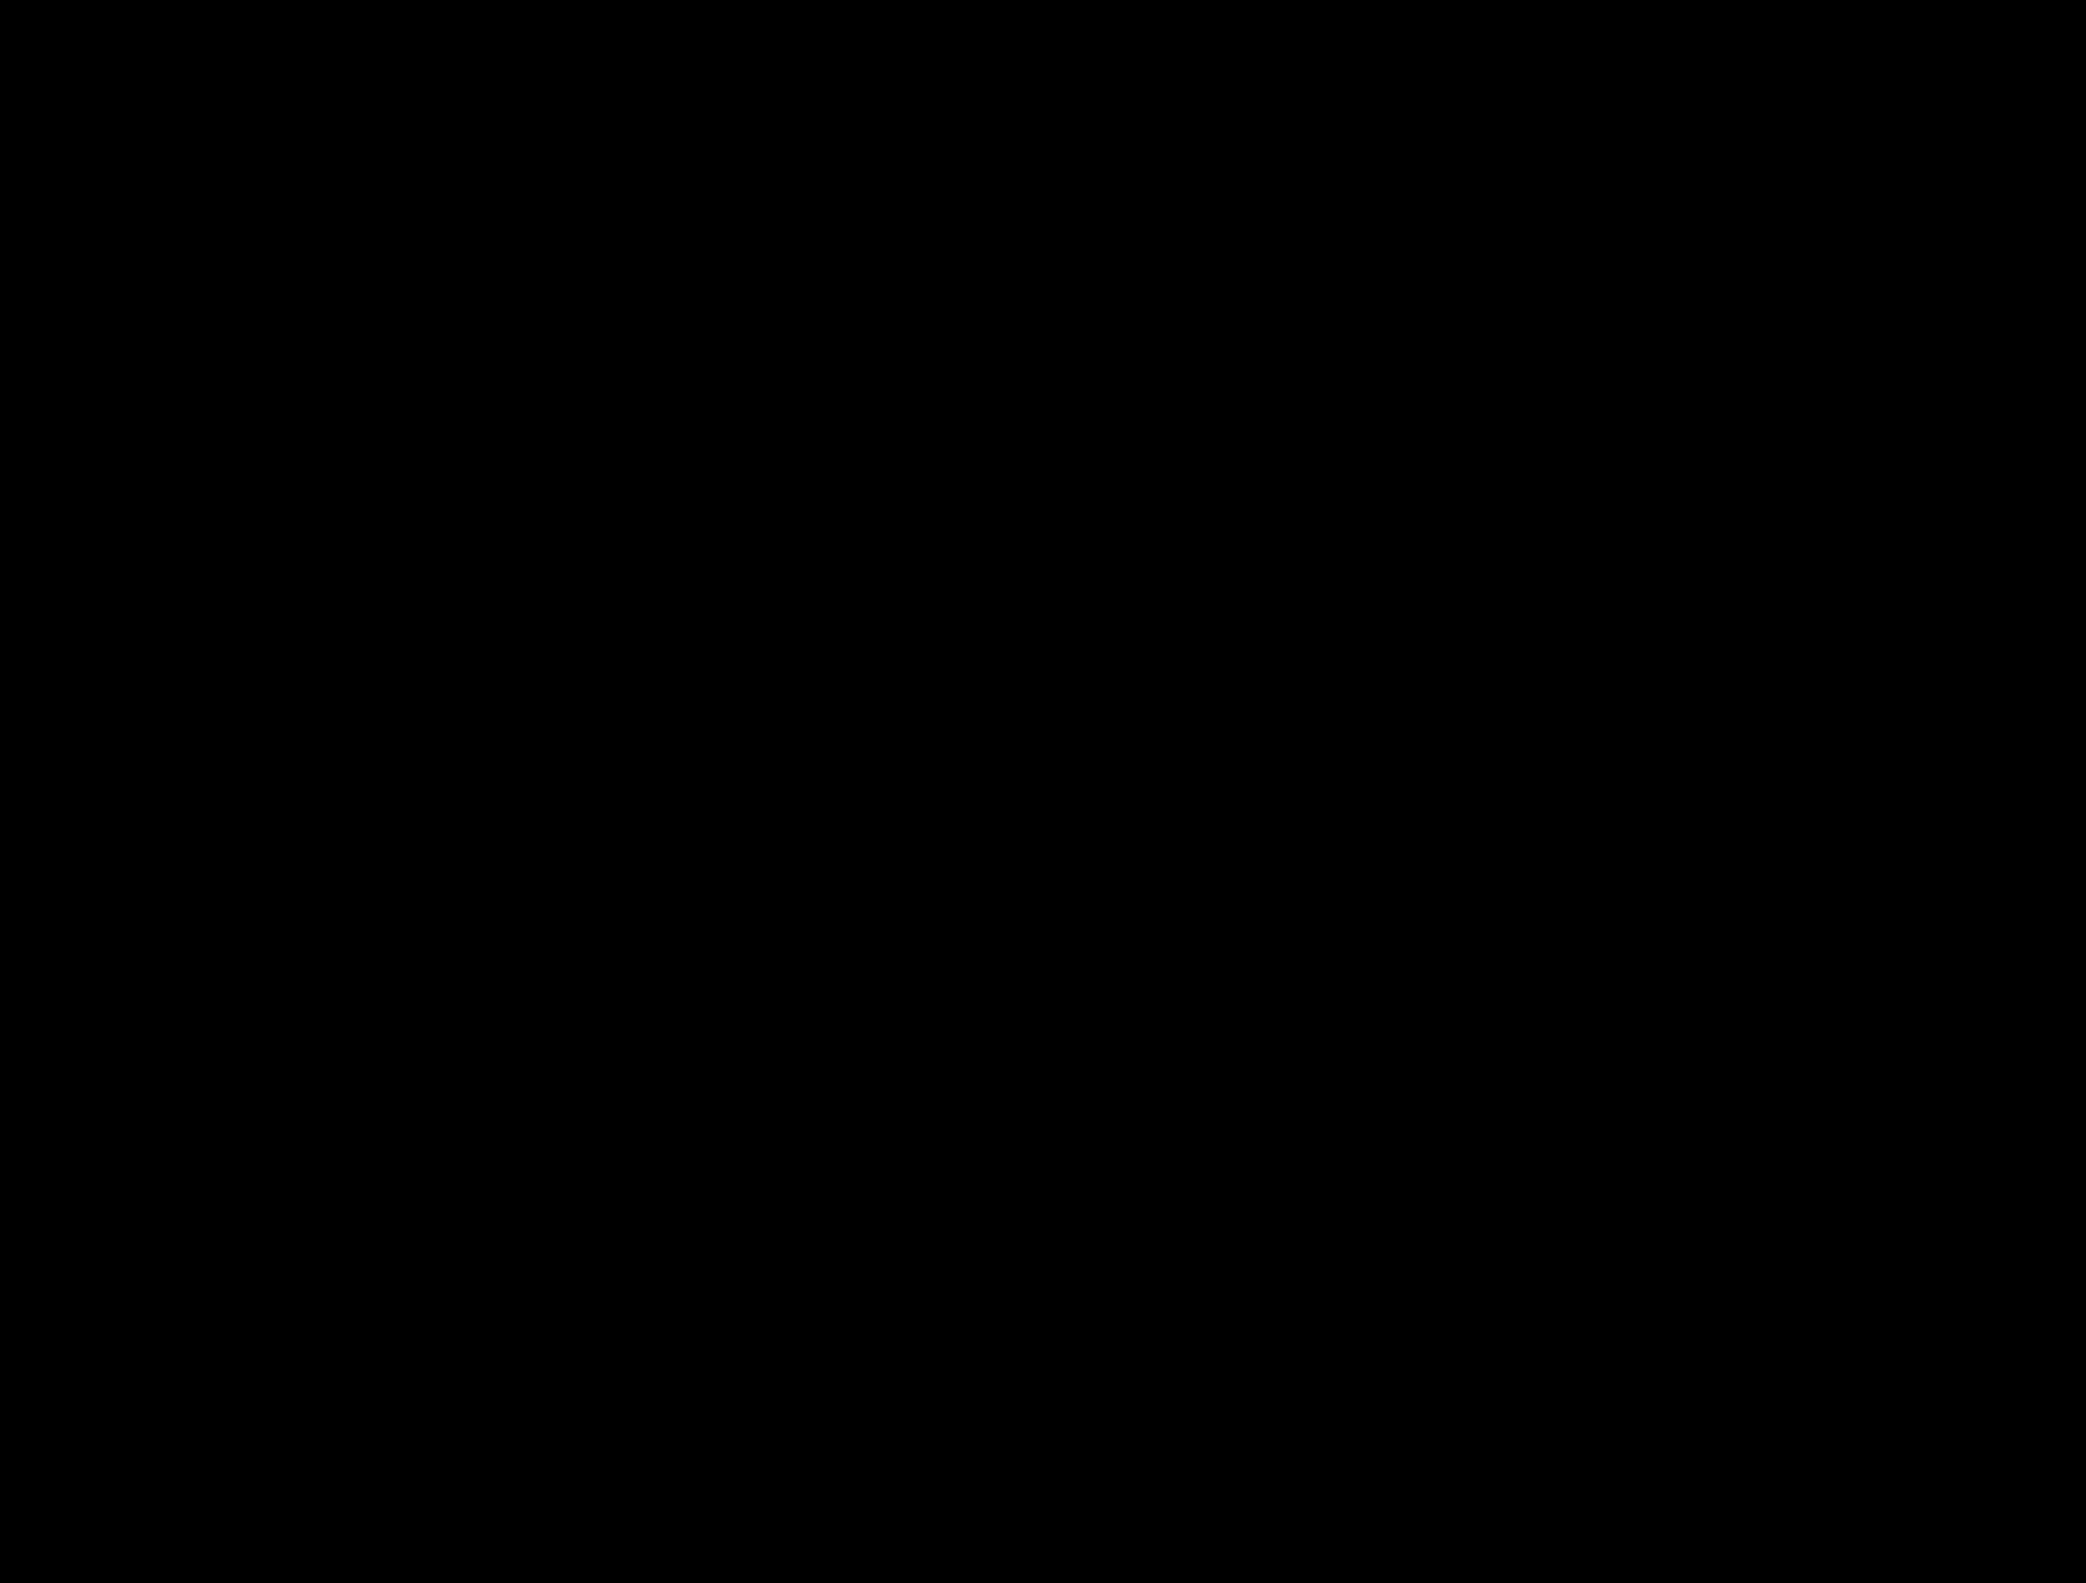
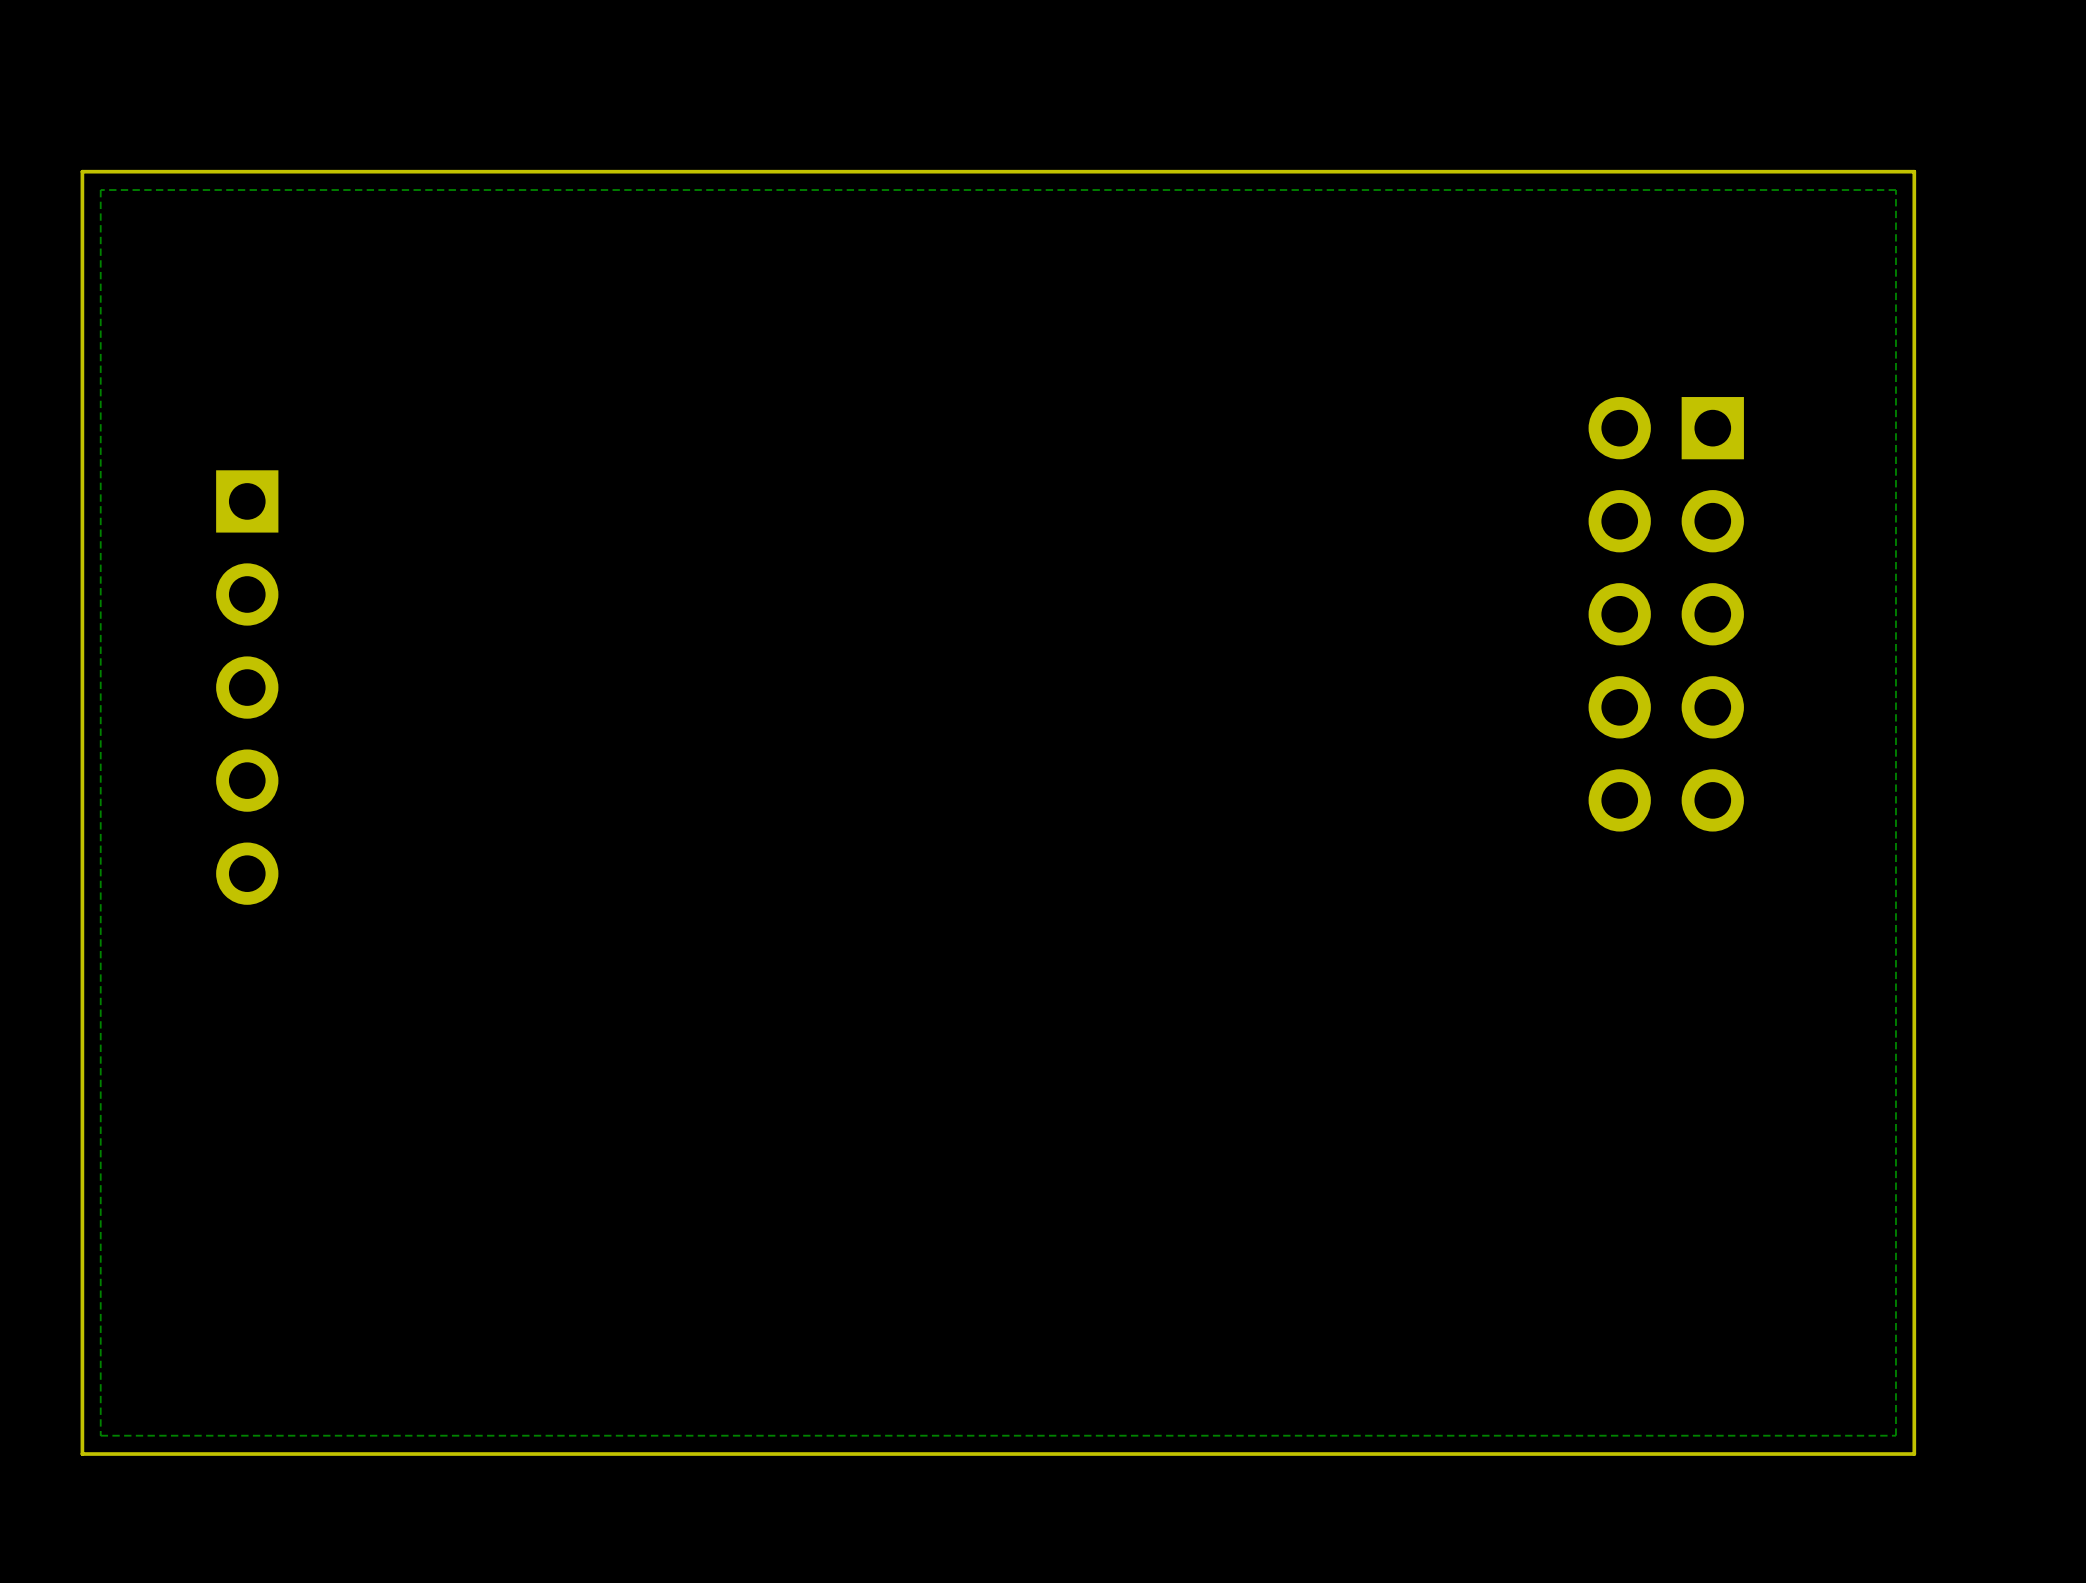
board edge: none -> (1914, 171) (82, 171) (82, 1454) (1914, 1454) (1914, 171)
zone outline: none -> (1895, 190) (100, 190) (100, 1435) (1895, 1435) (1895, 190)
part: none -> (1666, 614)
part: none -> (247, 687)

